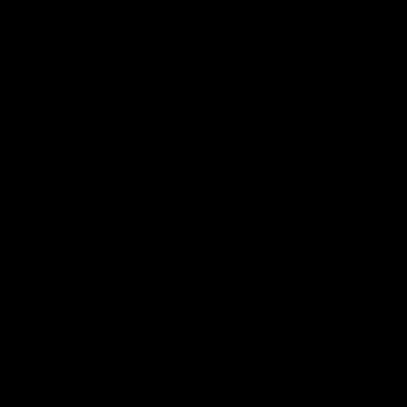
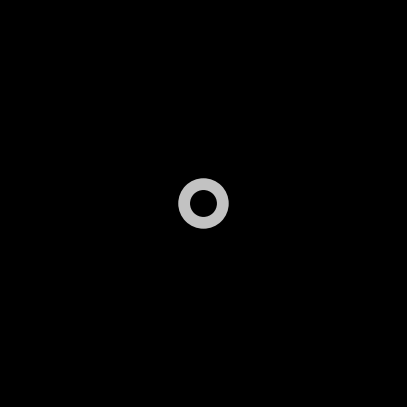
via: none -> (203, 203)

